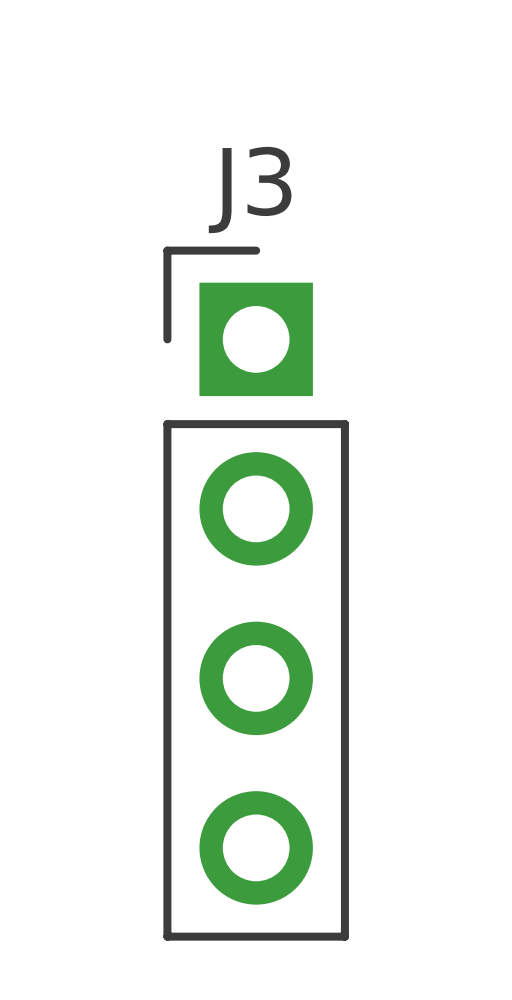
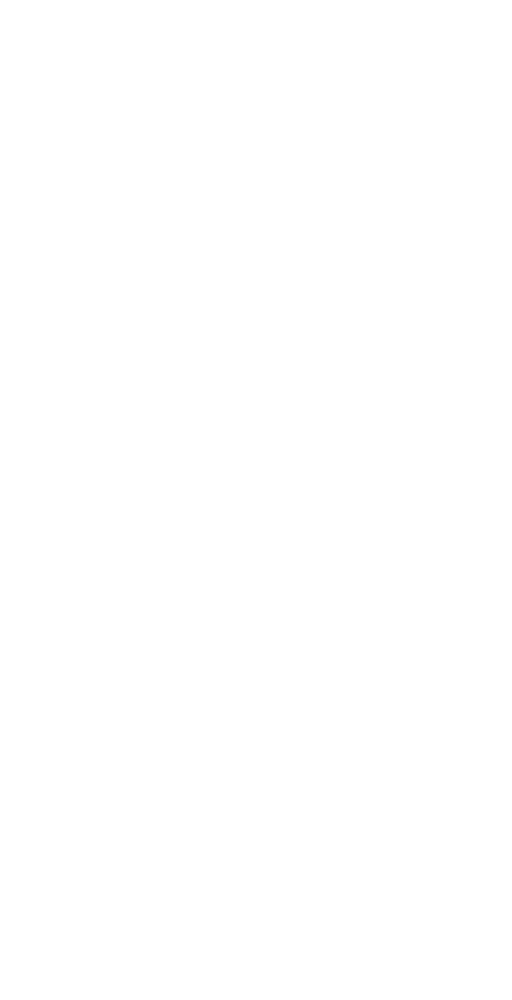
J3: (256, 593) -> none

